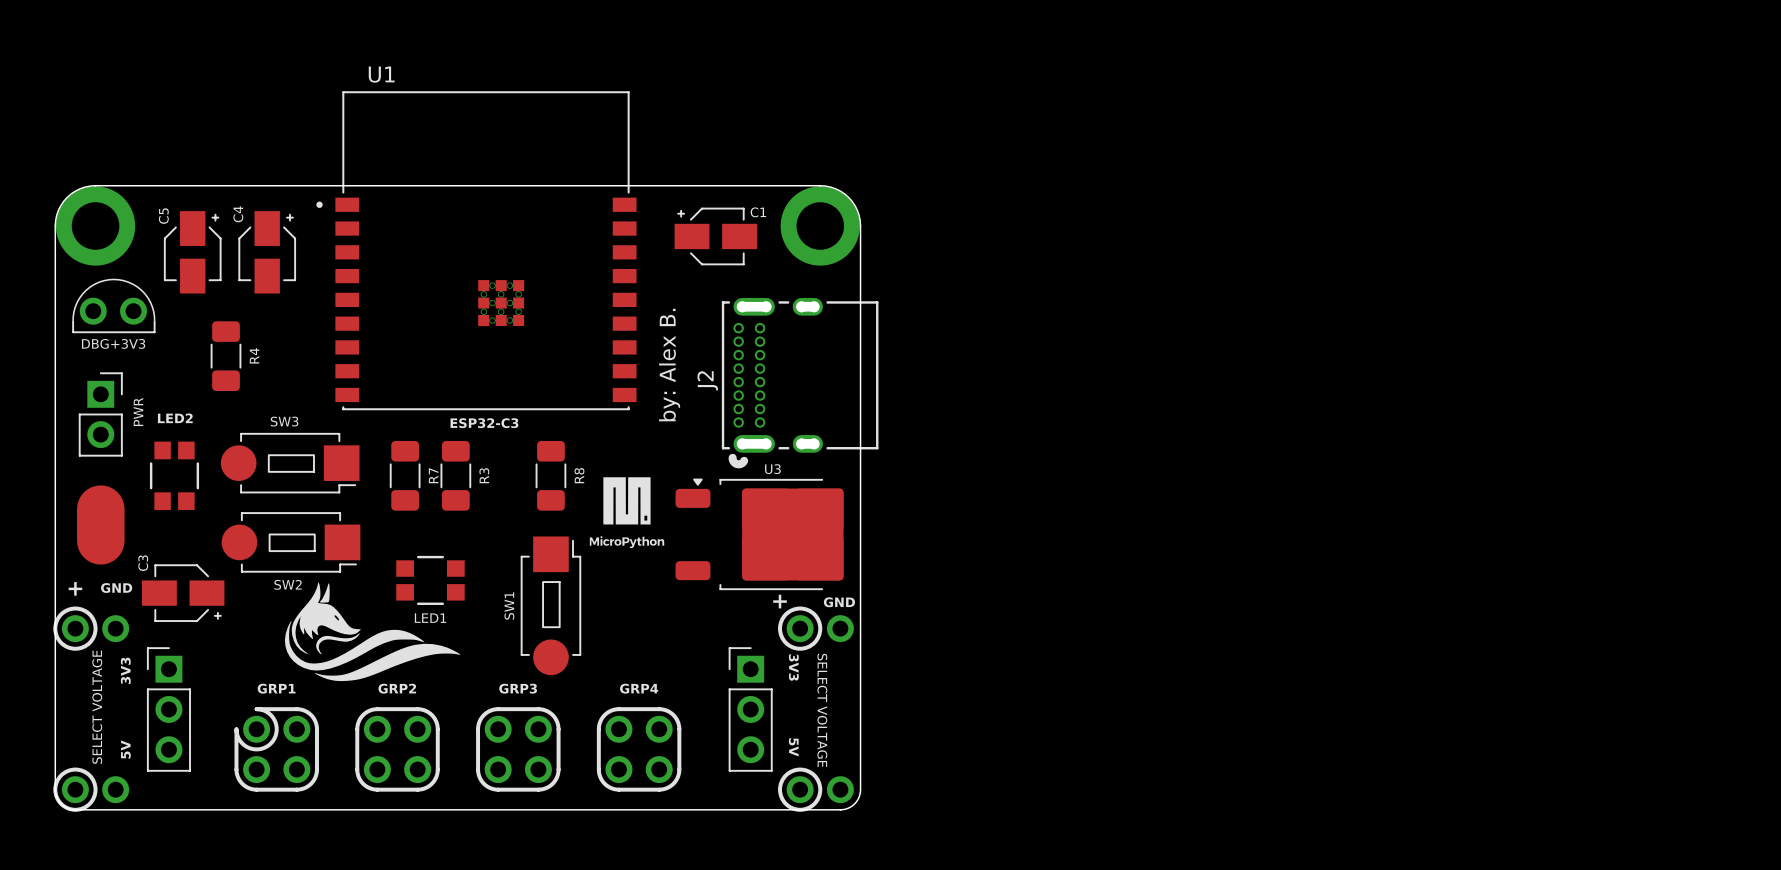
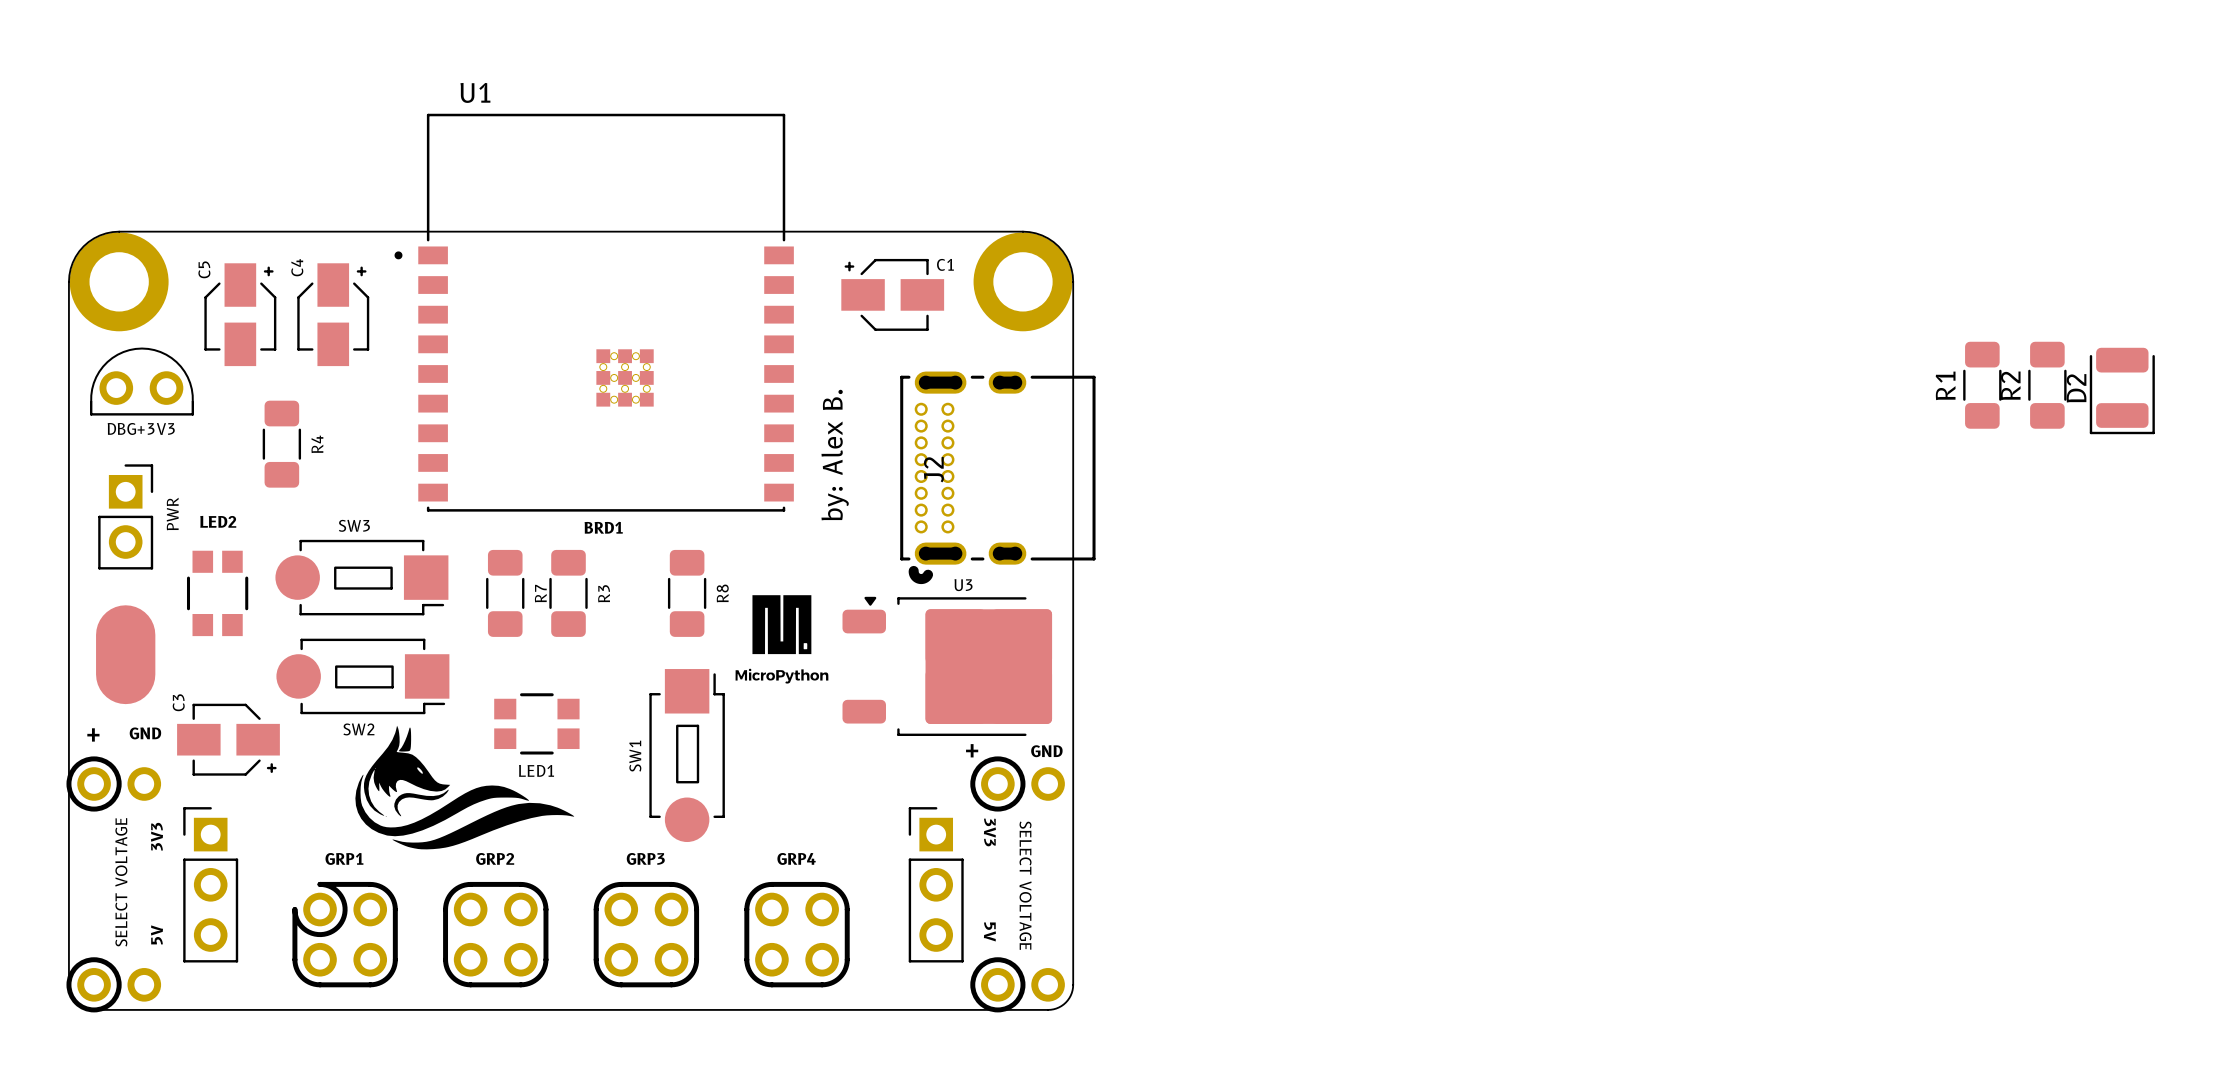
R1: none -> (1982, 385)
R2: none -> (2047, 385)
D2: none -> (2122, 390)
J2 name position: J2 (707, 380) -> J2 (933, 469)
ESP32-C3 name: ESP32-C3 (484, 423) -> BRD1 (603, 527)

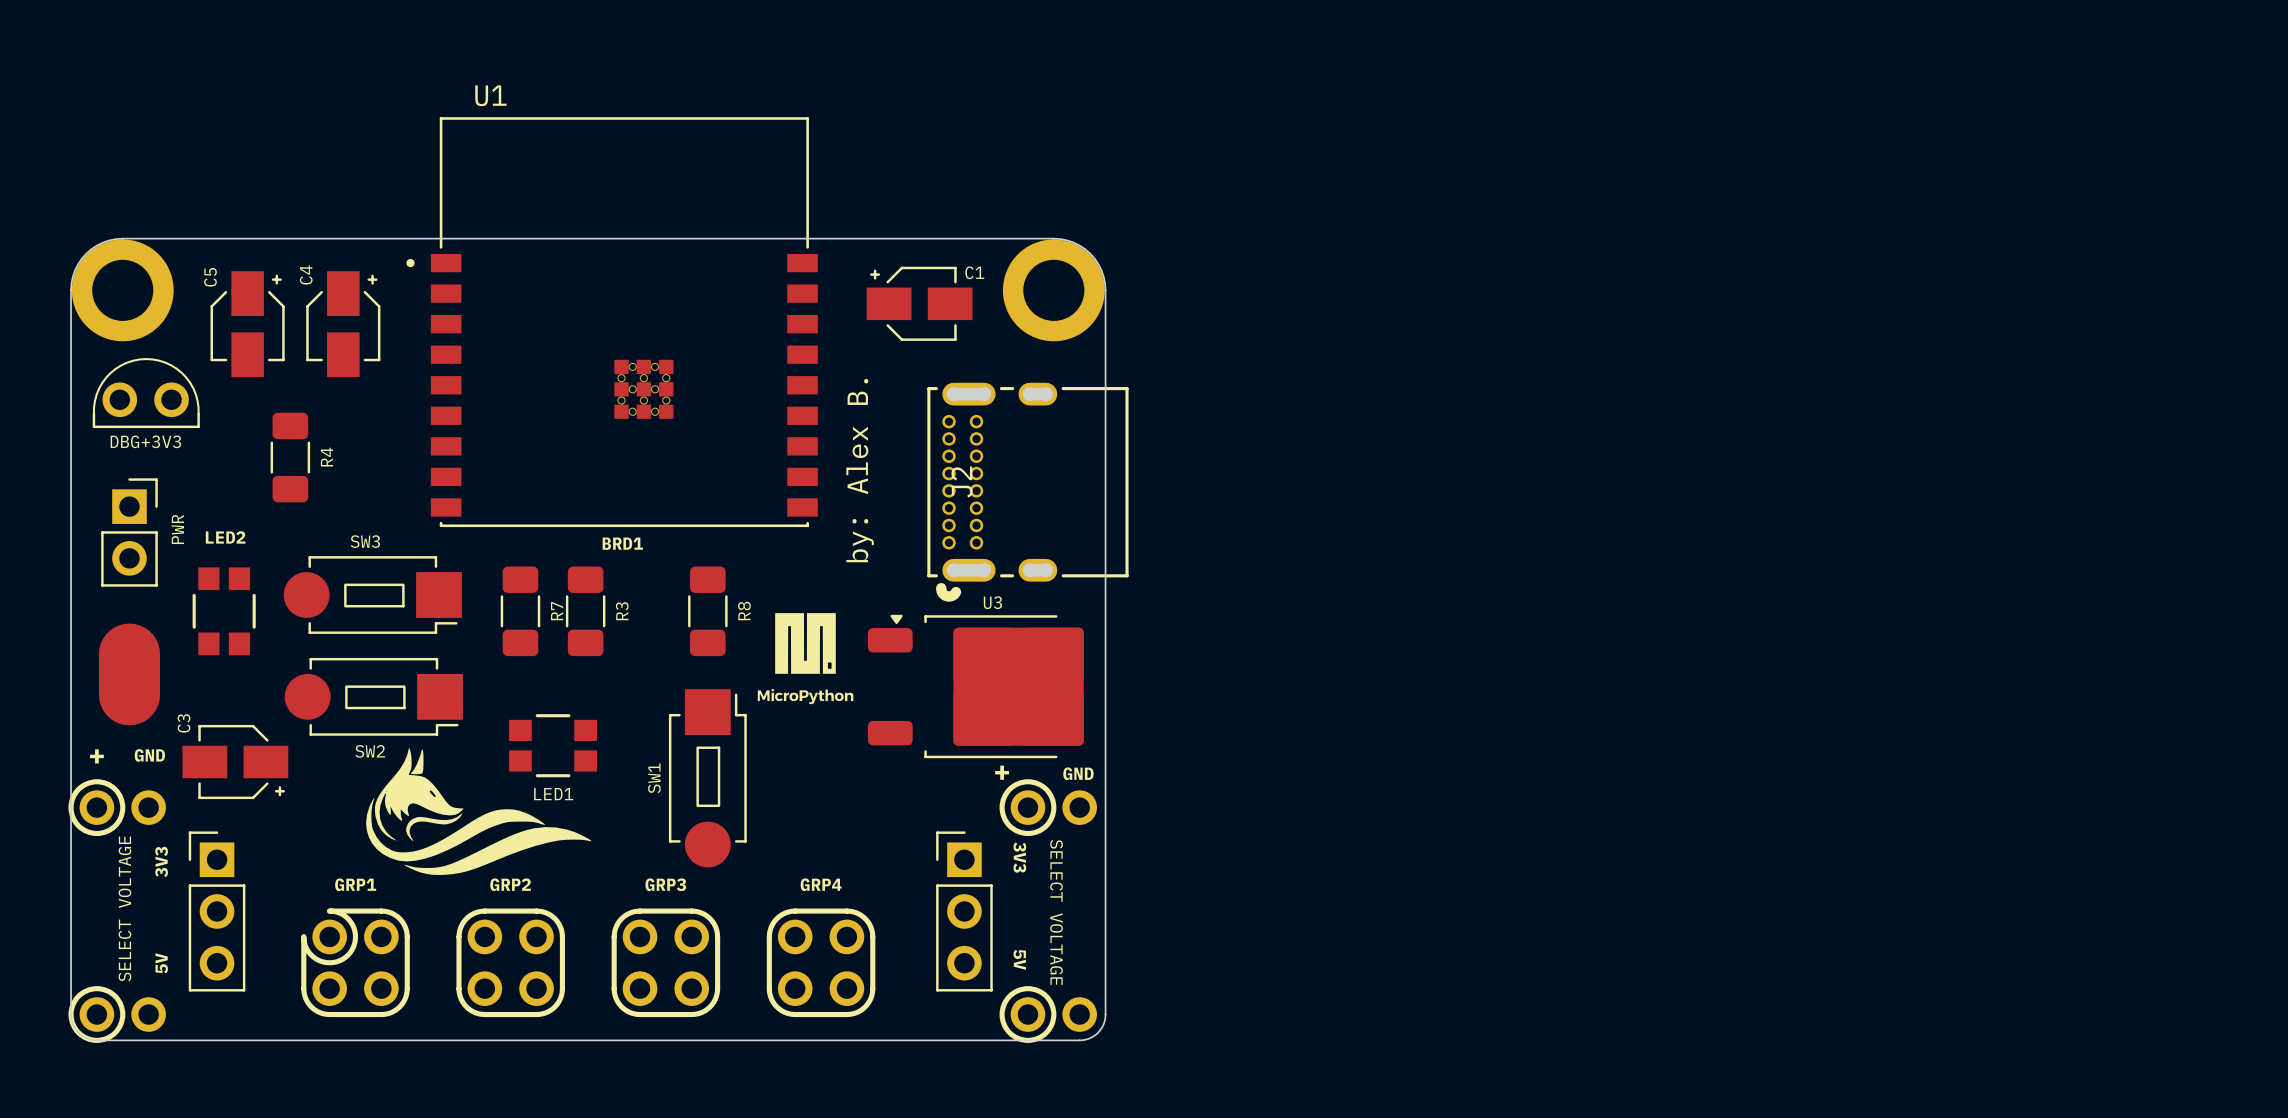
R1: (1982, 385) -> none
R2: (2047, 385) -> none
D2: (2122, 390) -> none

